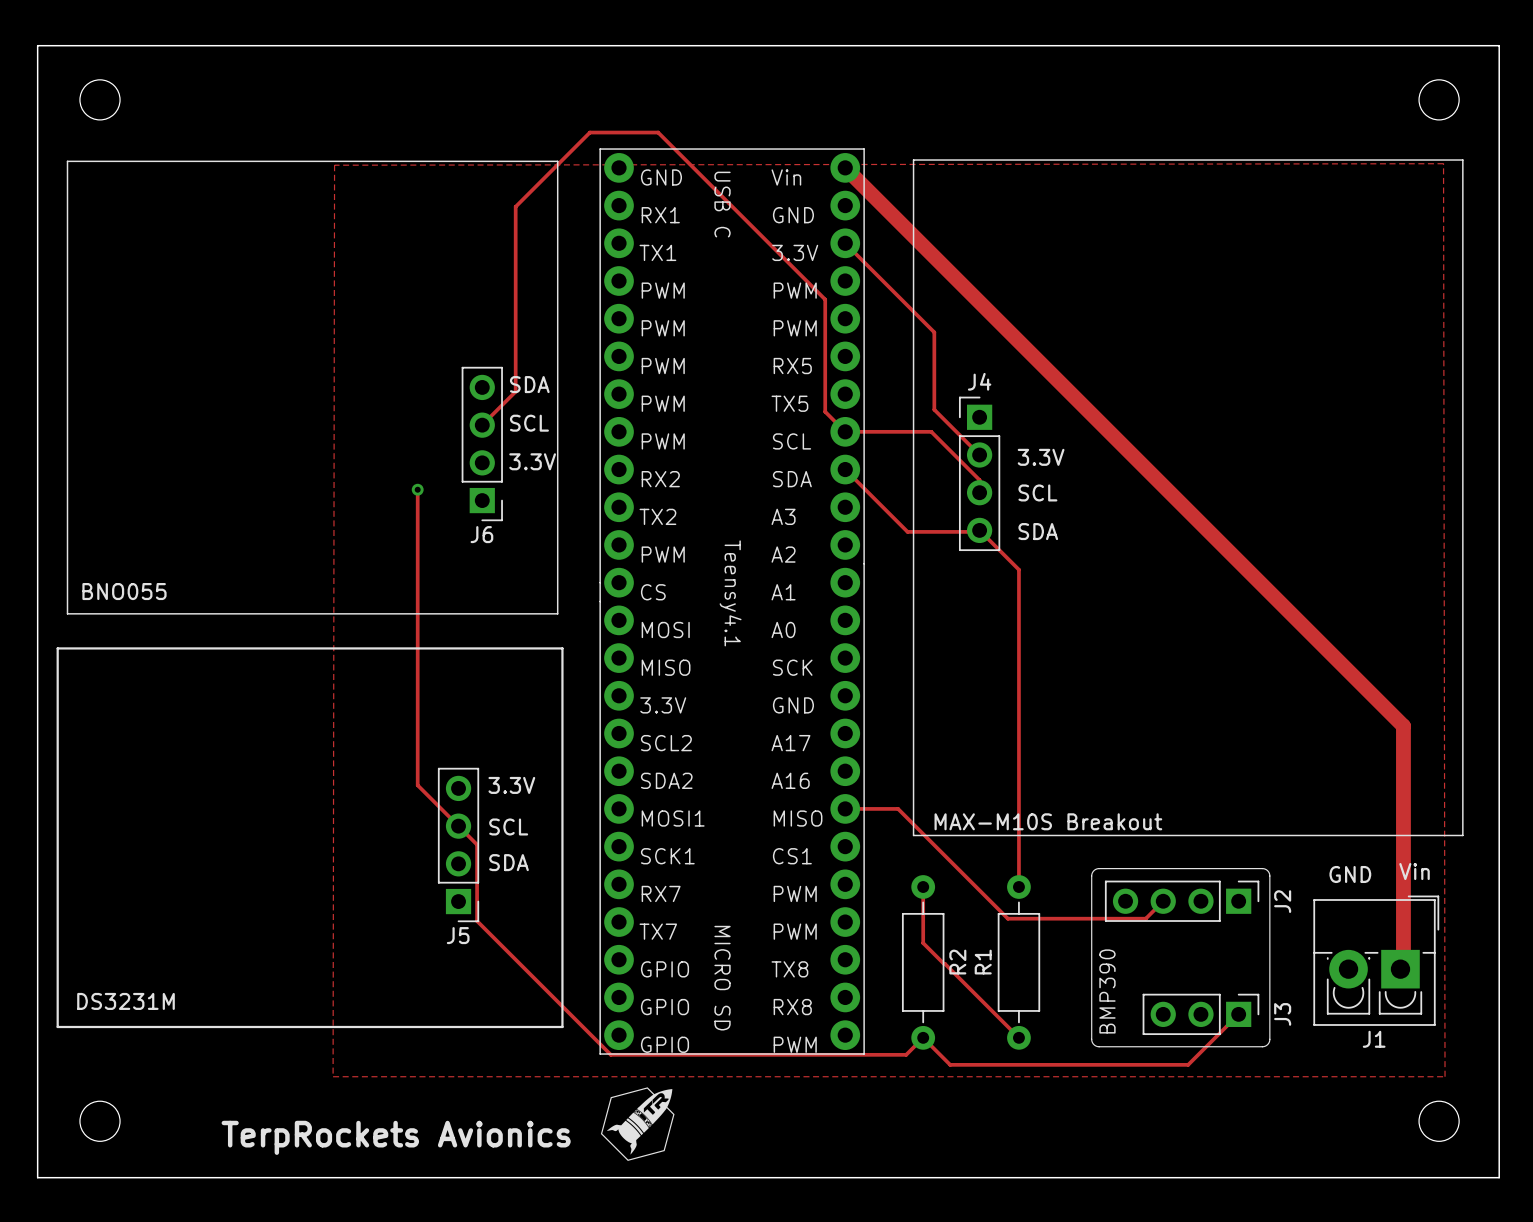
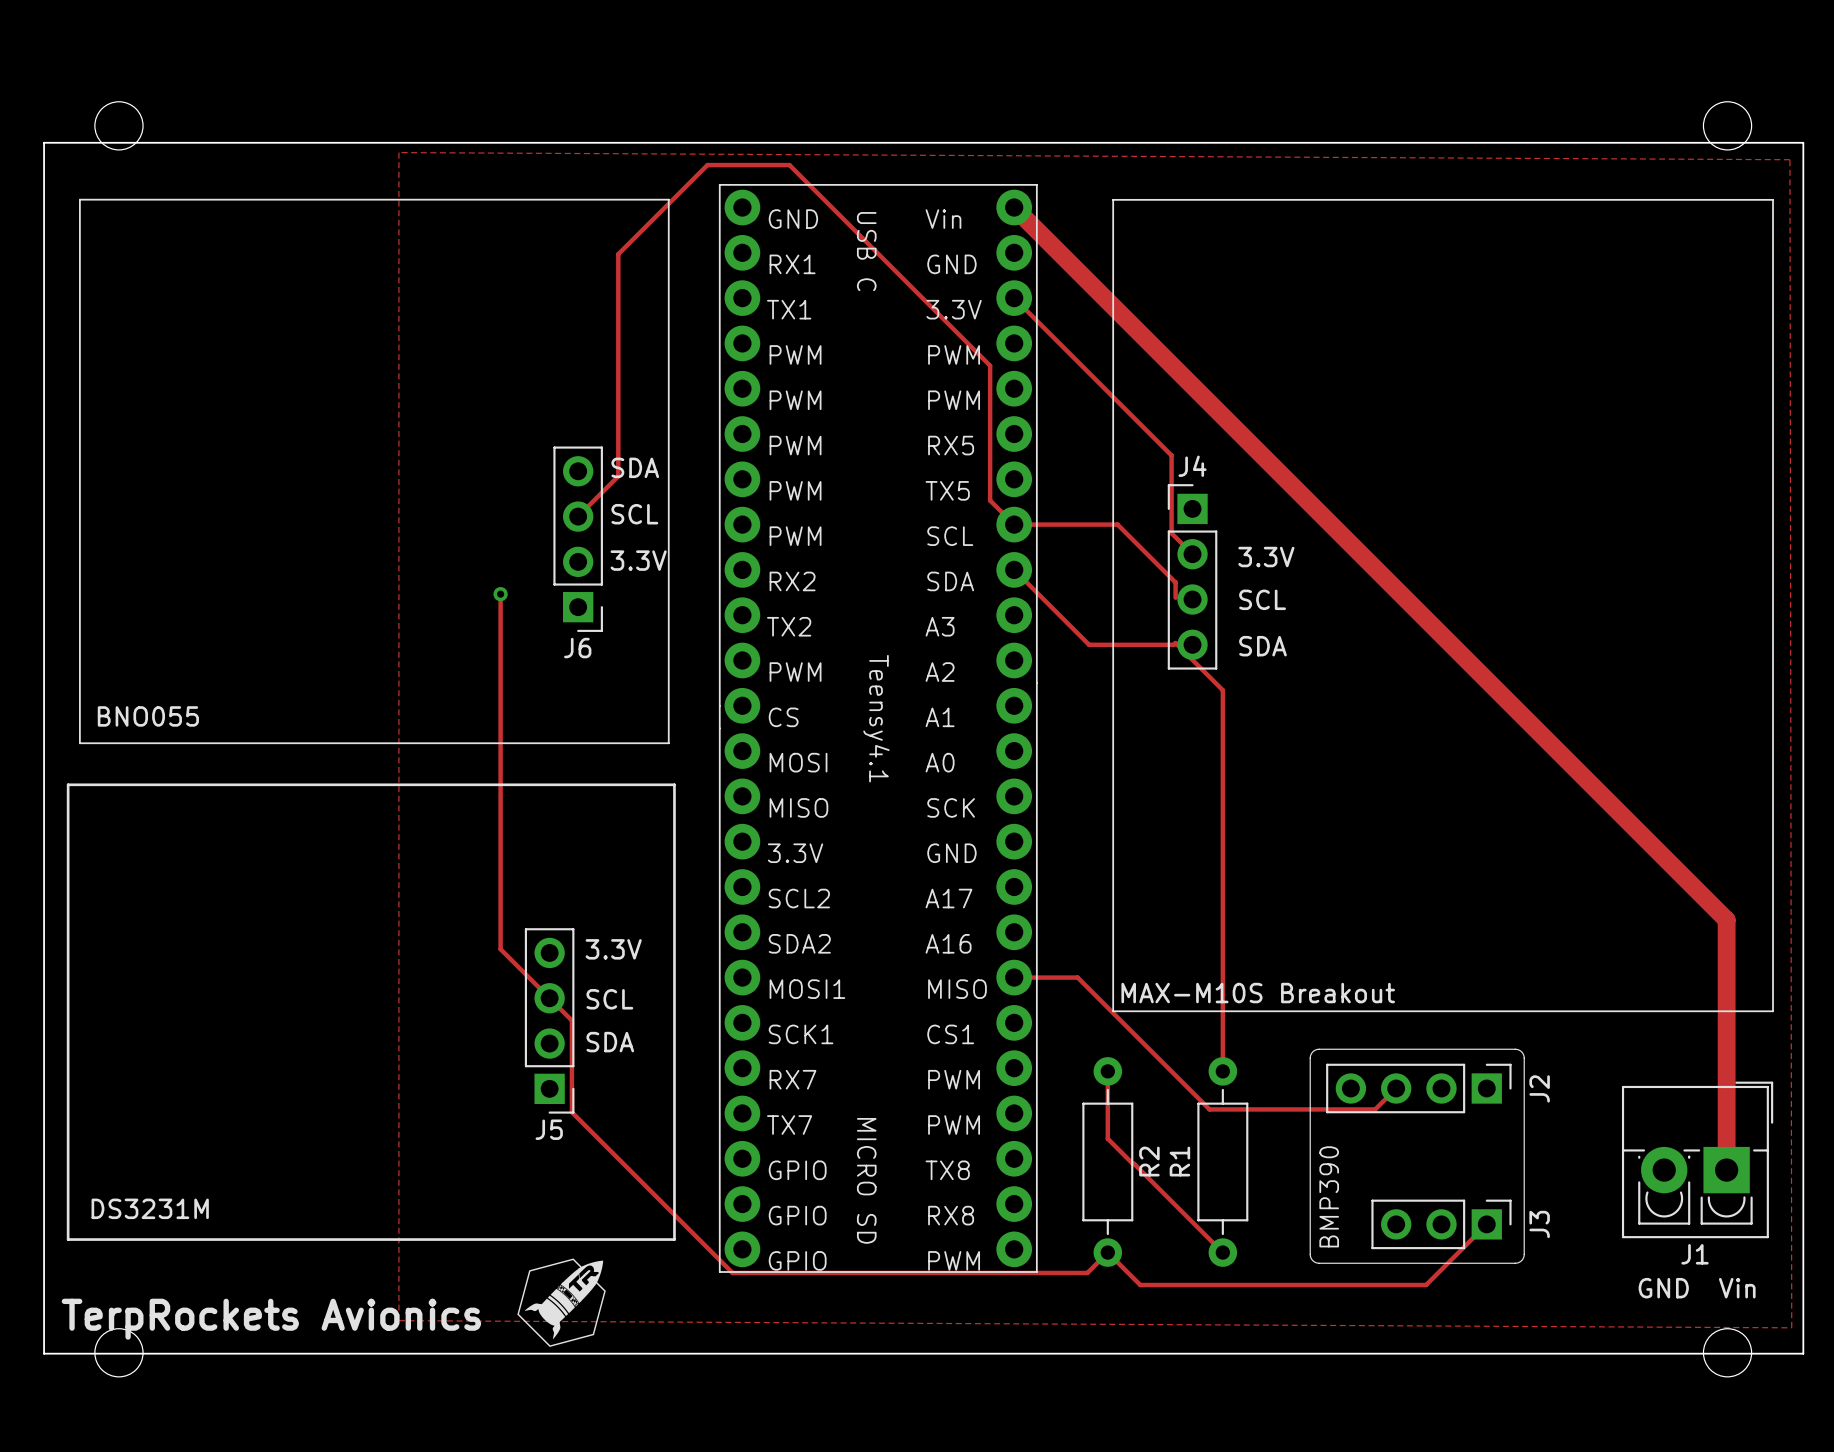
board edge: (37, 113) (37, 45) (1499, 45) (1499, 1177) (37, 1177) (37, 1122) -> (44, 142) (1803, 142) (1803, 1353) (44, 1353)
line: (913, 160) (1462, 160) (1462, 835) (913, 835) (913, 160) -> (1113, 199) (1773, 199) (1773, 1011) (1113, 1011) (1113, 199)
zone outline: (1443, 163) (1445, 1076) (333, 1076) (334, 165) (1443, 163) -> (398, 152) (398, 1320) (1791, 1327) (1789, 159) (398, 152)
track: (934, 332) (934, 409) (979, 454) -> (1121, 405) (1171, 455) (1171, 533) (1192, 554)
text position: 3.3V (1041, 457) -> 3.3V (1266, 557)
J4 position: (979, 473) -> (1192, 576)
text position: SCL (1037, 492) -> SCL (1262, 599)
text position: SDA (1038, 531) -> SDA (1262, 646)
track: (1403, 726) (1403, 966) (1400, 969) -> (1684, 878) (1726, 919) (1726, 1170)
text position: Vin (1414, 871) -> Vin (1737, 1288)
text position: GND (1350, 874) -> GND (1663, 1288)
J1 position: (1376, 960) -> (1697, 1159)
drawing position: (637, 1124) -> (561, 1302)
text position: TerpRockets Avionics (396, 1137) -> TerpRockets Avionics (271, 1319)

